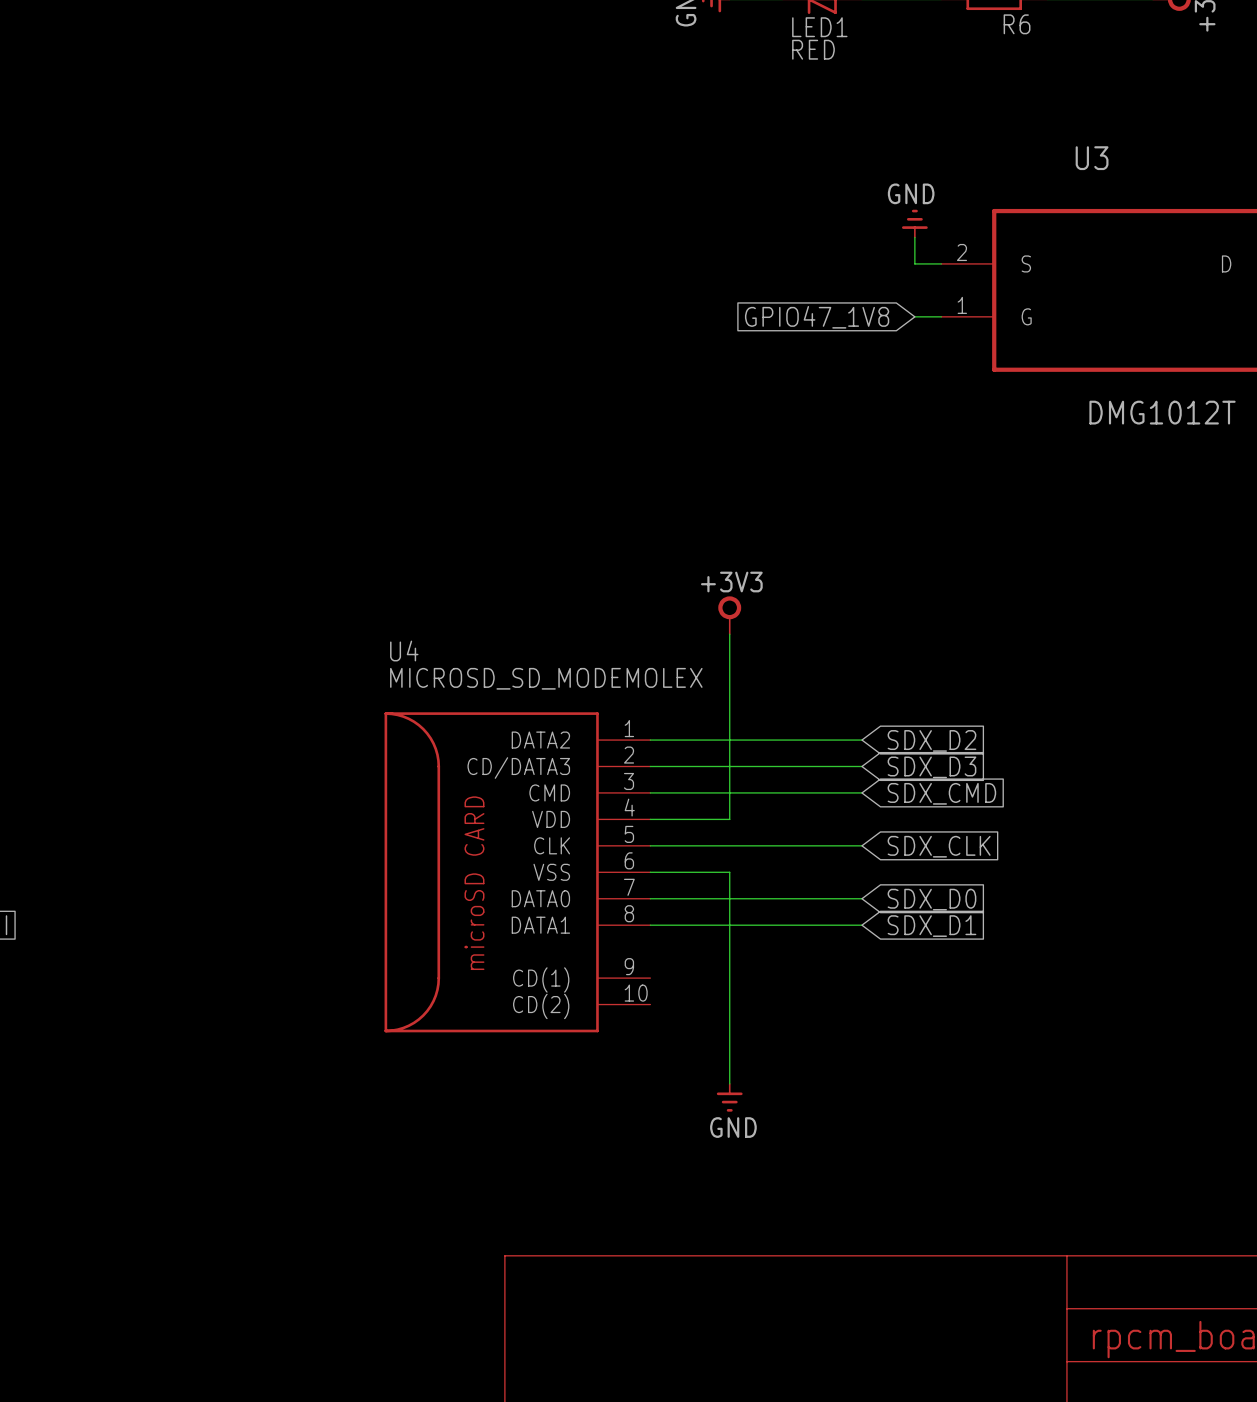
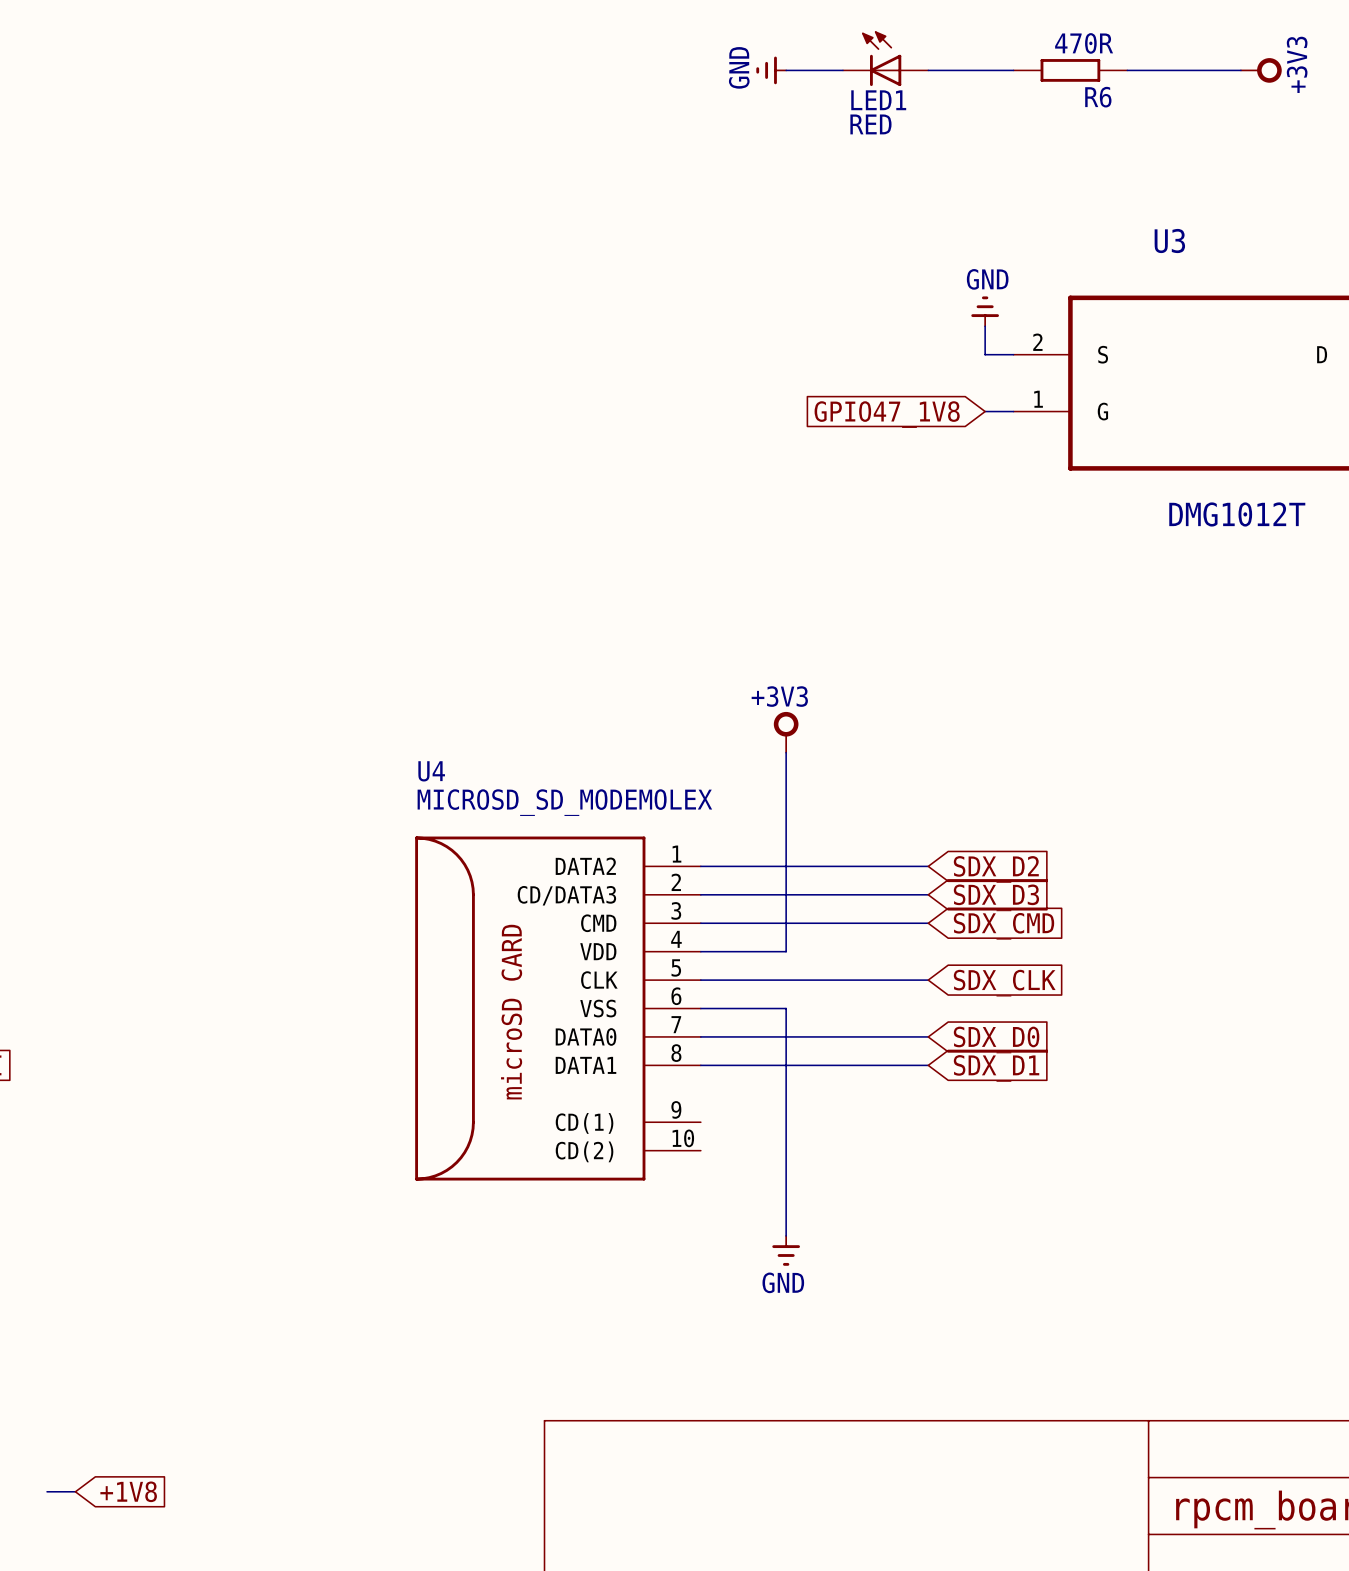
wire: none -> (47, 1491) (75, 1491)
global label: none -> +1V8 (128, 1491)

